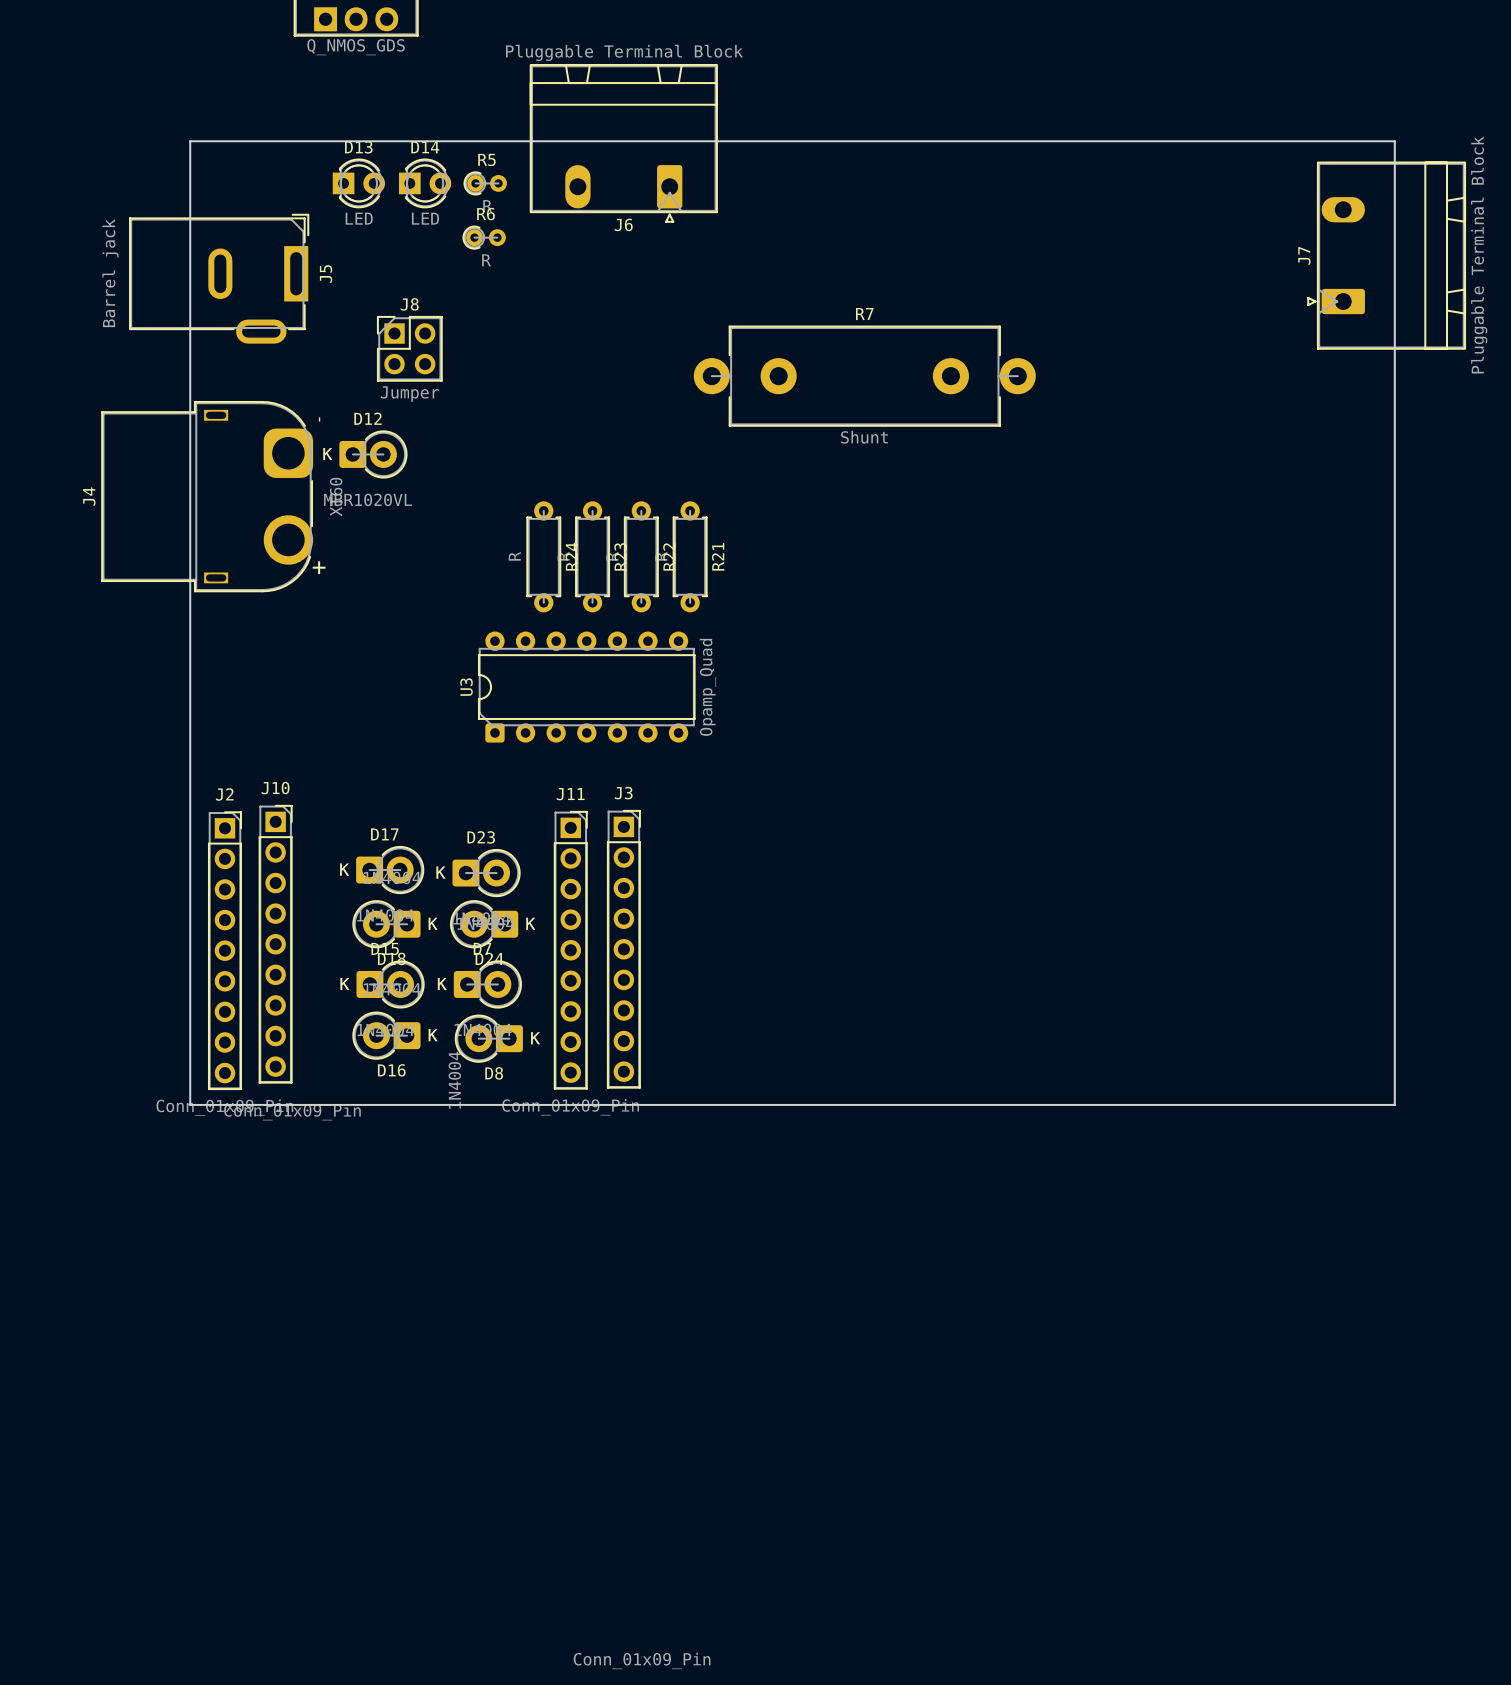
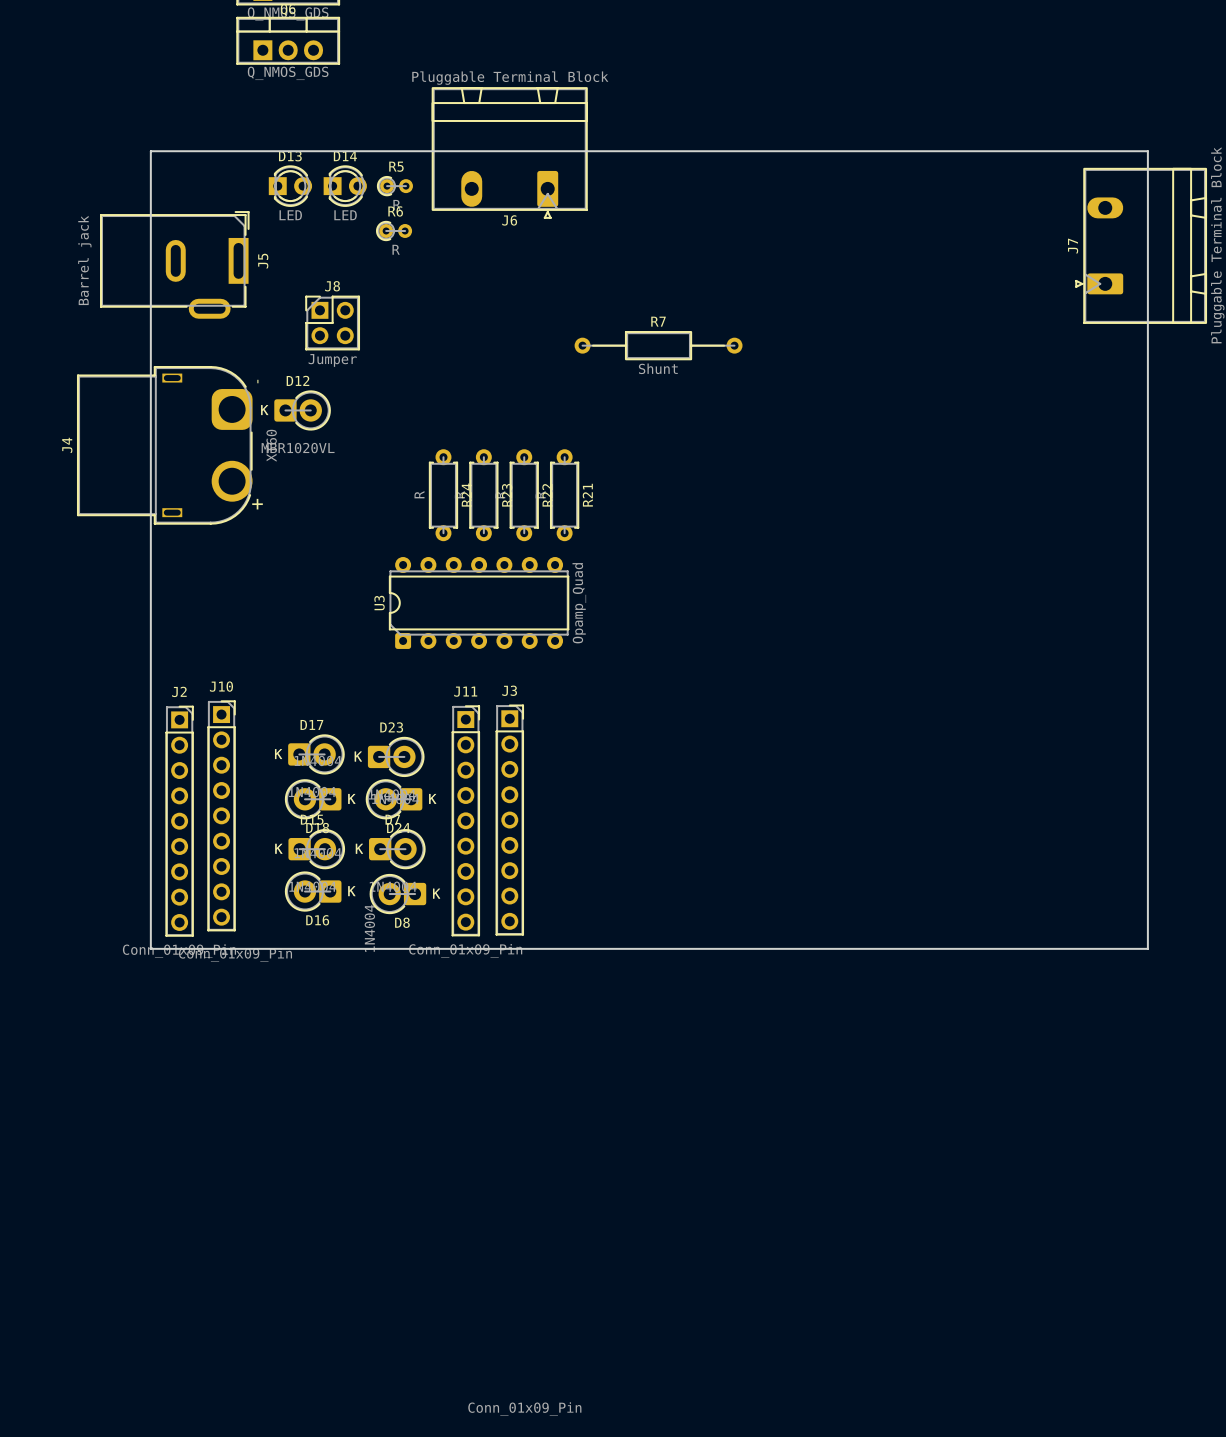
R7 name position: R7 (864, 314) -> R7 (658, 321)
R7 footprint: [693, 325, 1036, 427] -> [574, 331, 743, 360]
R7 value position: Shunt (864, 437) -> Shunt (658, 368)

